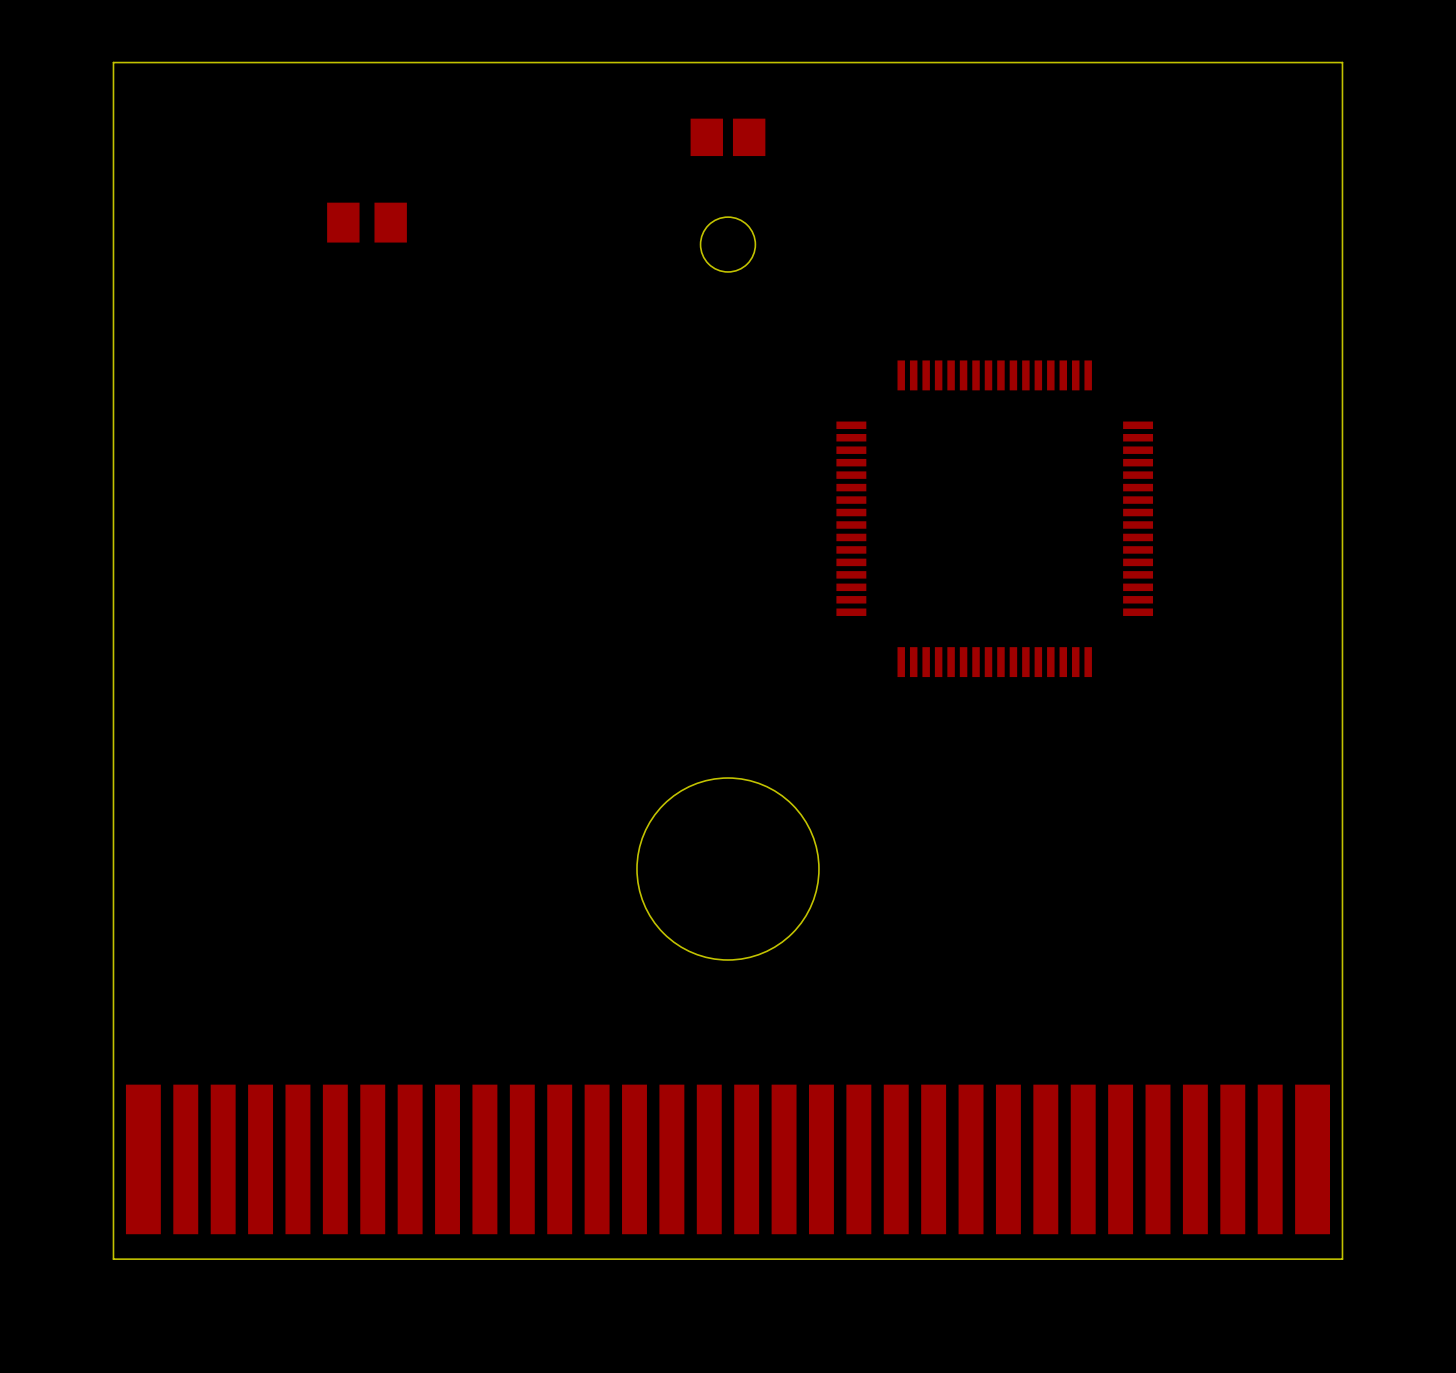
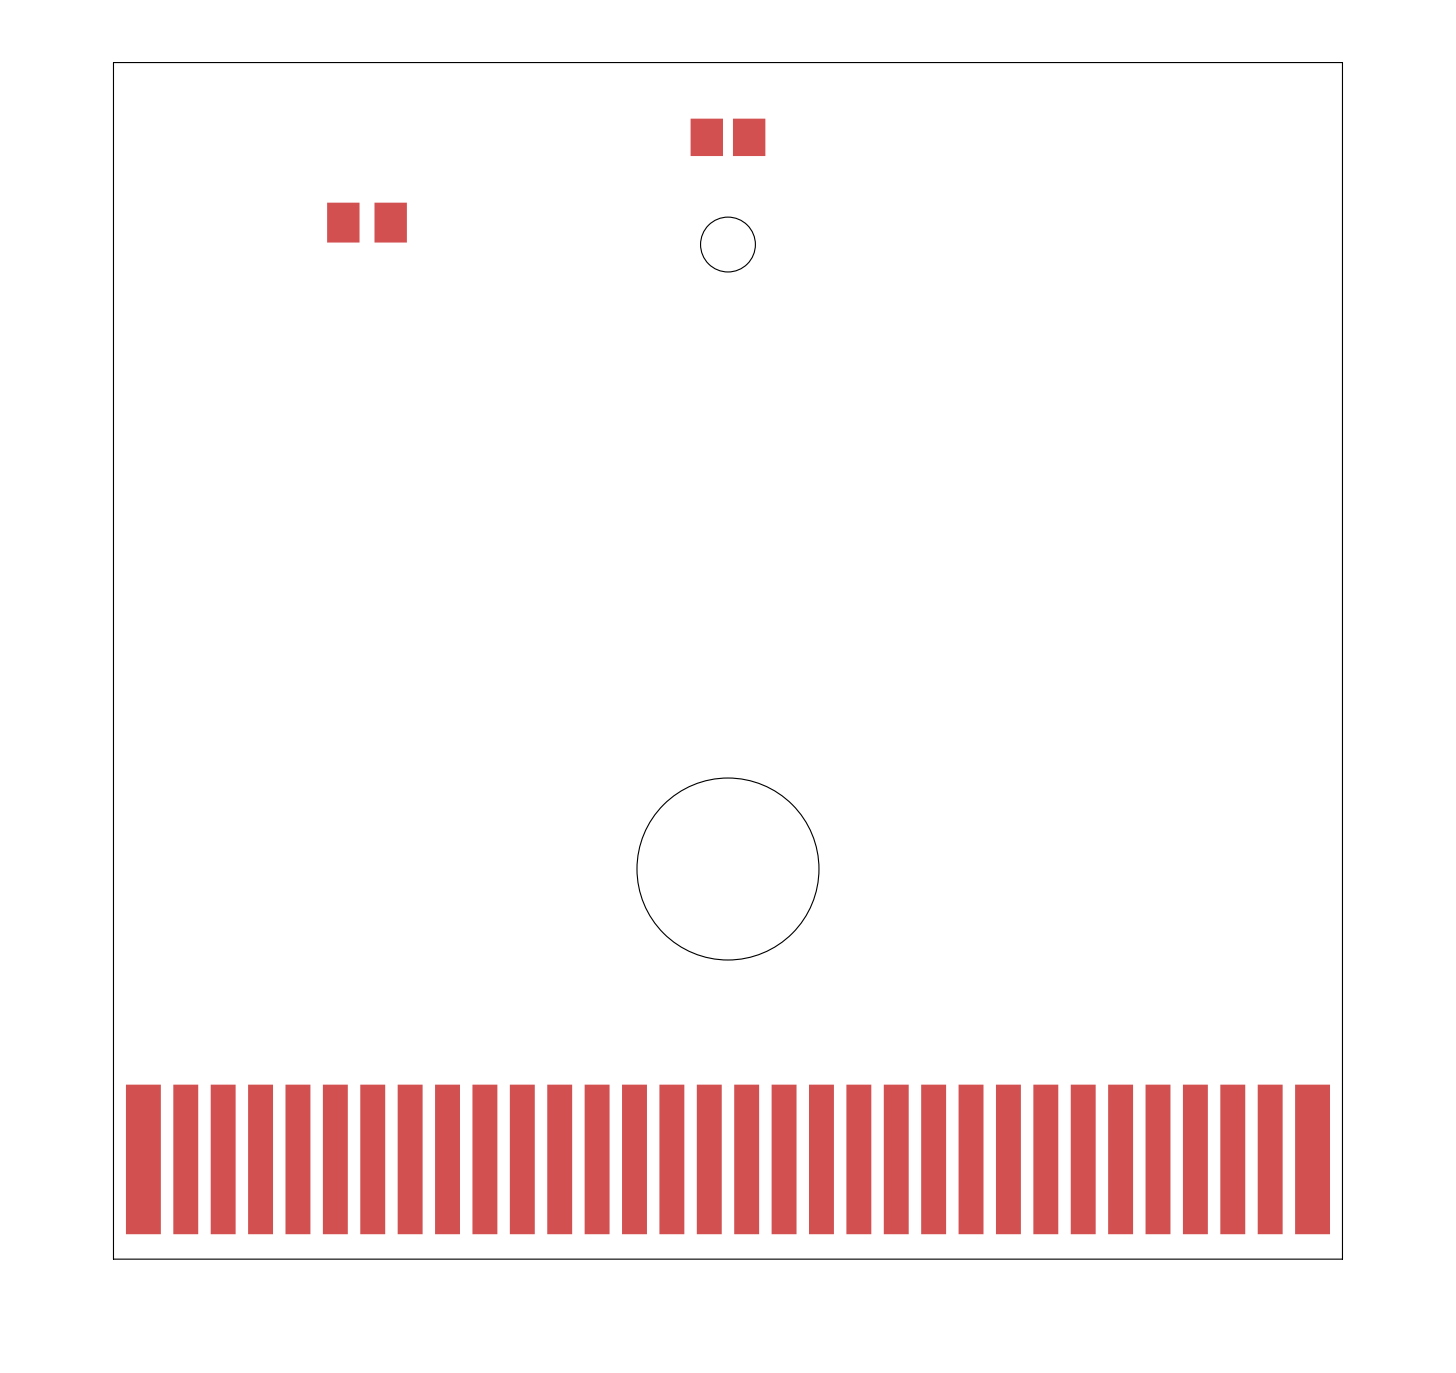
part: (994, 518) -> none

